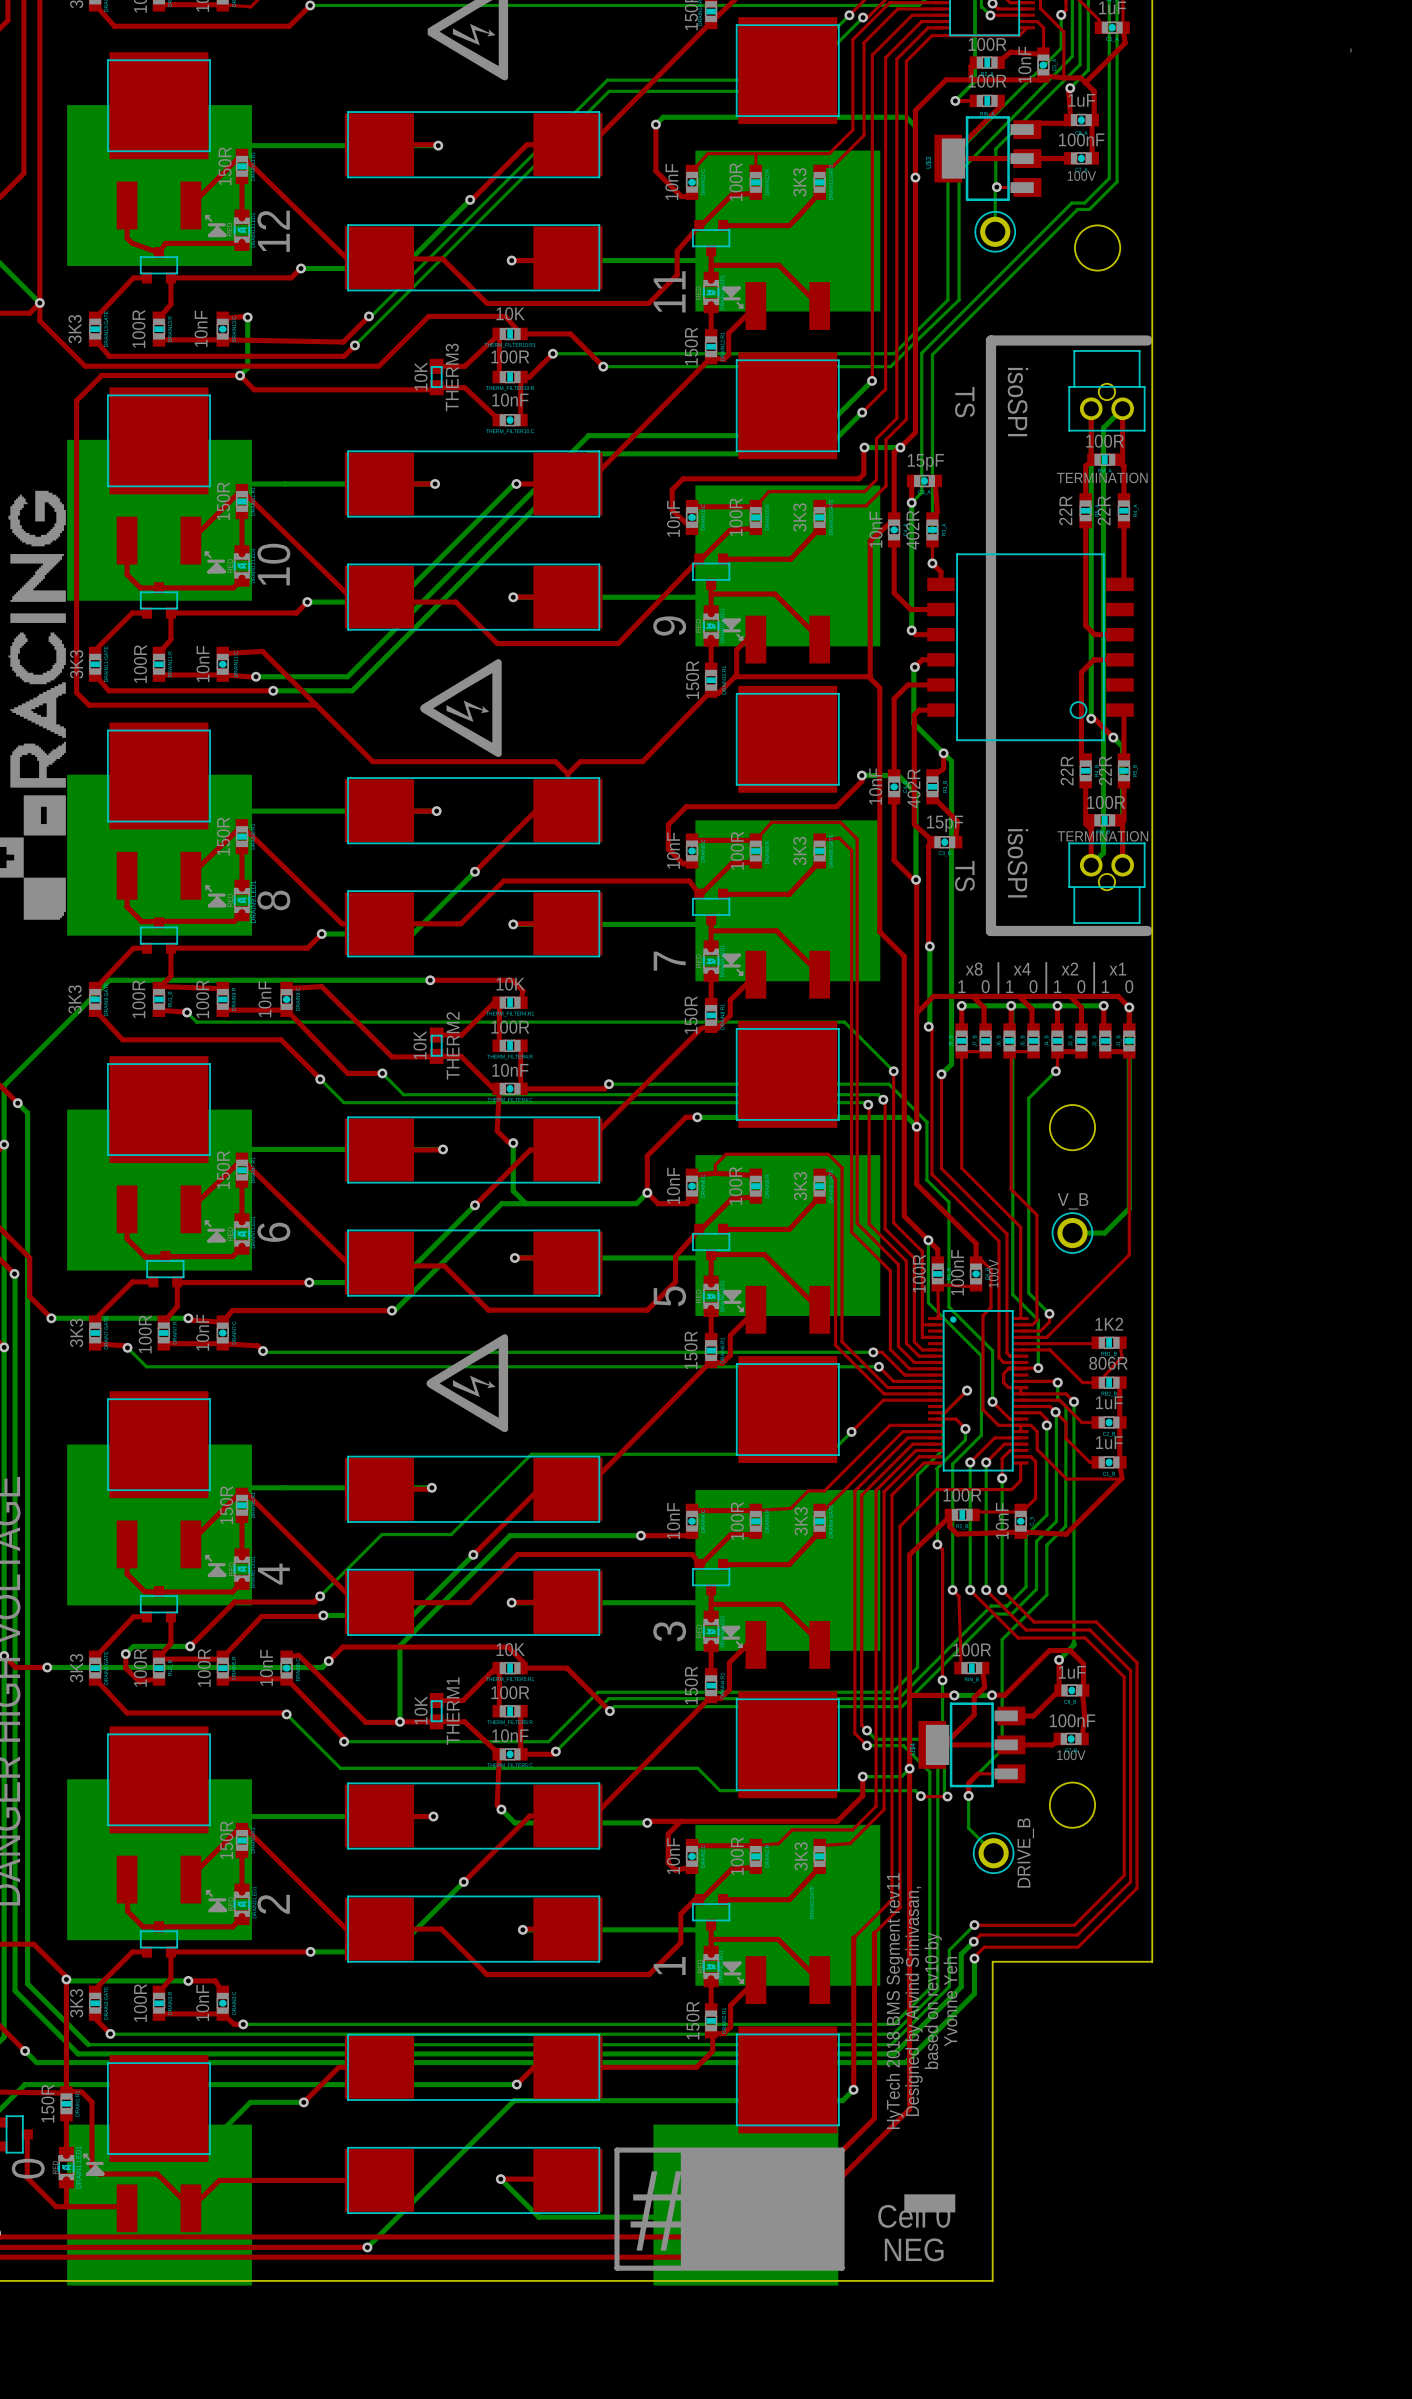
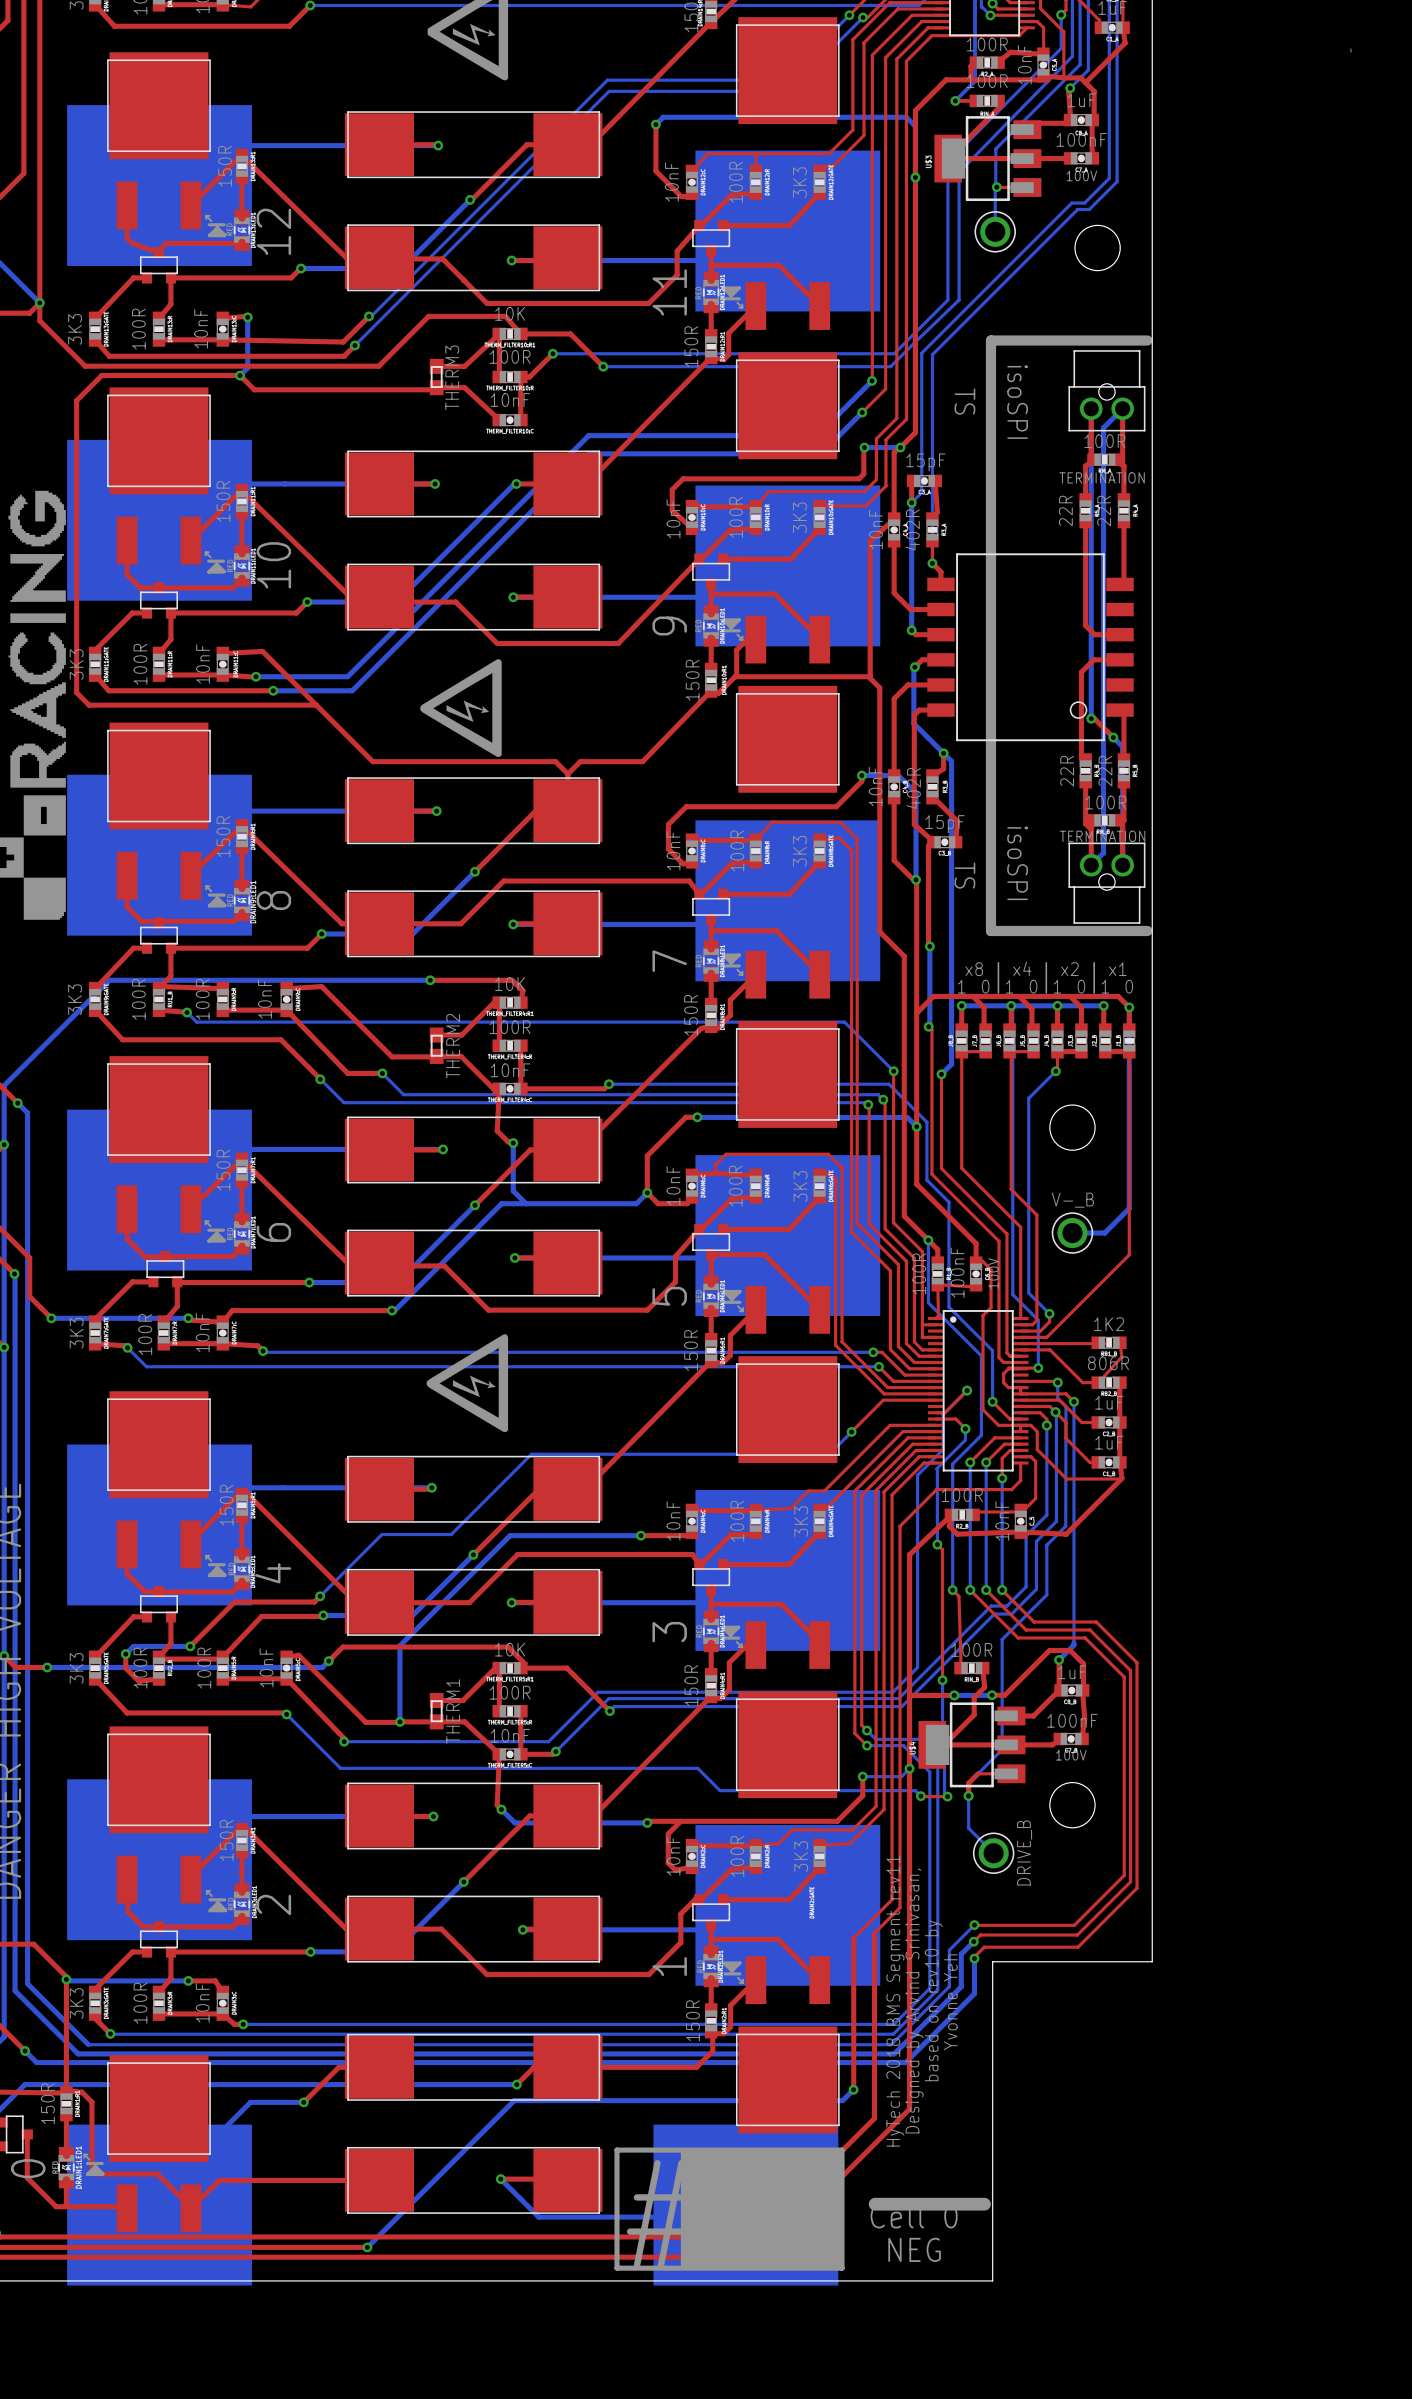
THERM3 value: 10K (421, 376) -> none
THERM2 value: 10K (420, 1045) -> none
text: V_B (1073, 1201) -> V-_B (1072, 1200)
THERM1 value: 10K (421, 1710) -> none

